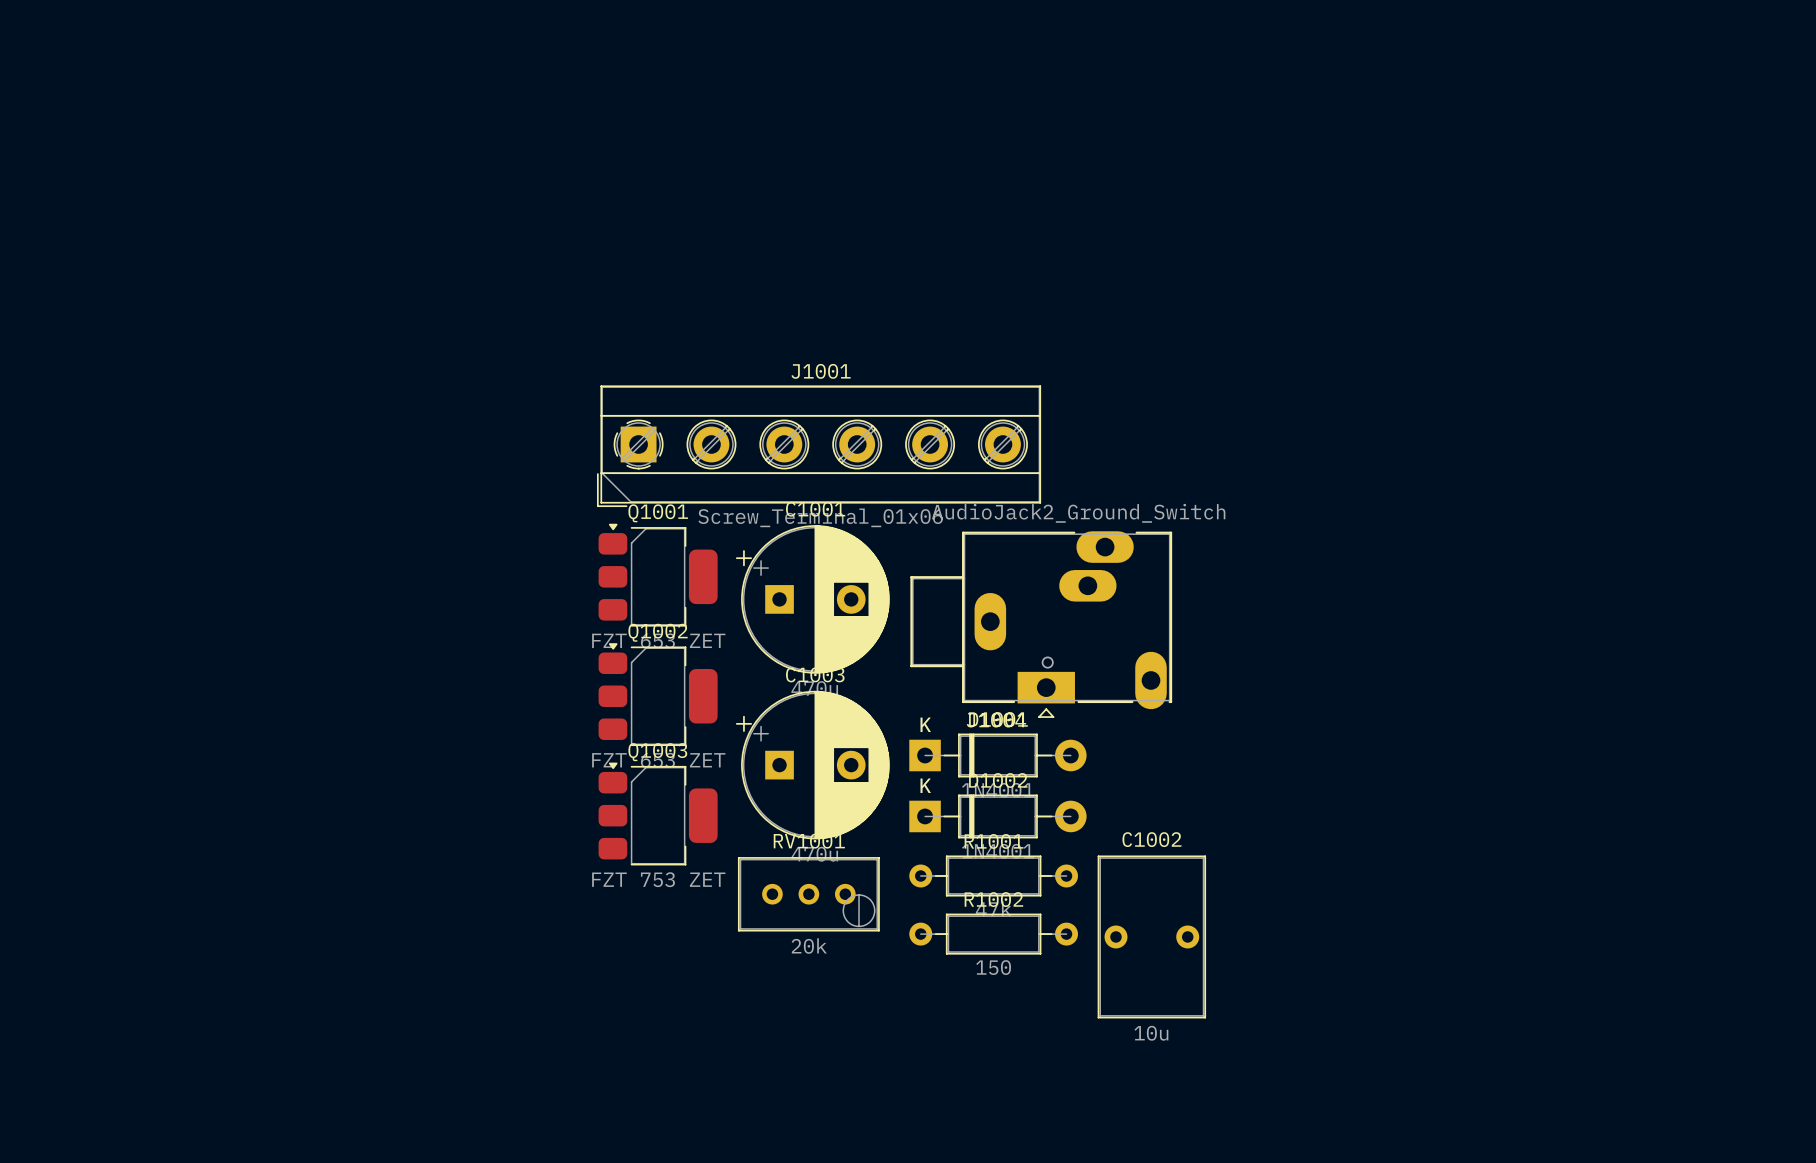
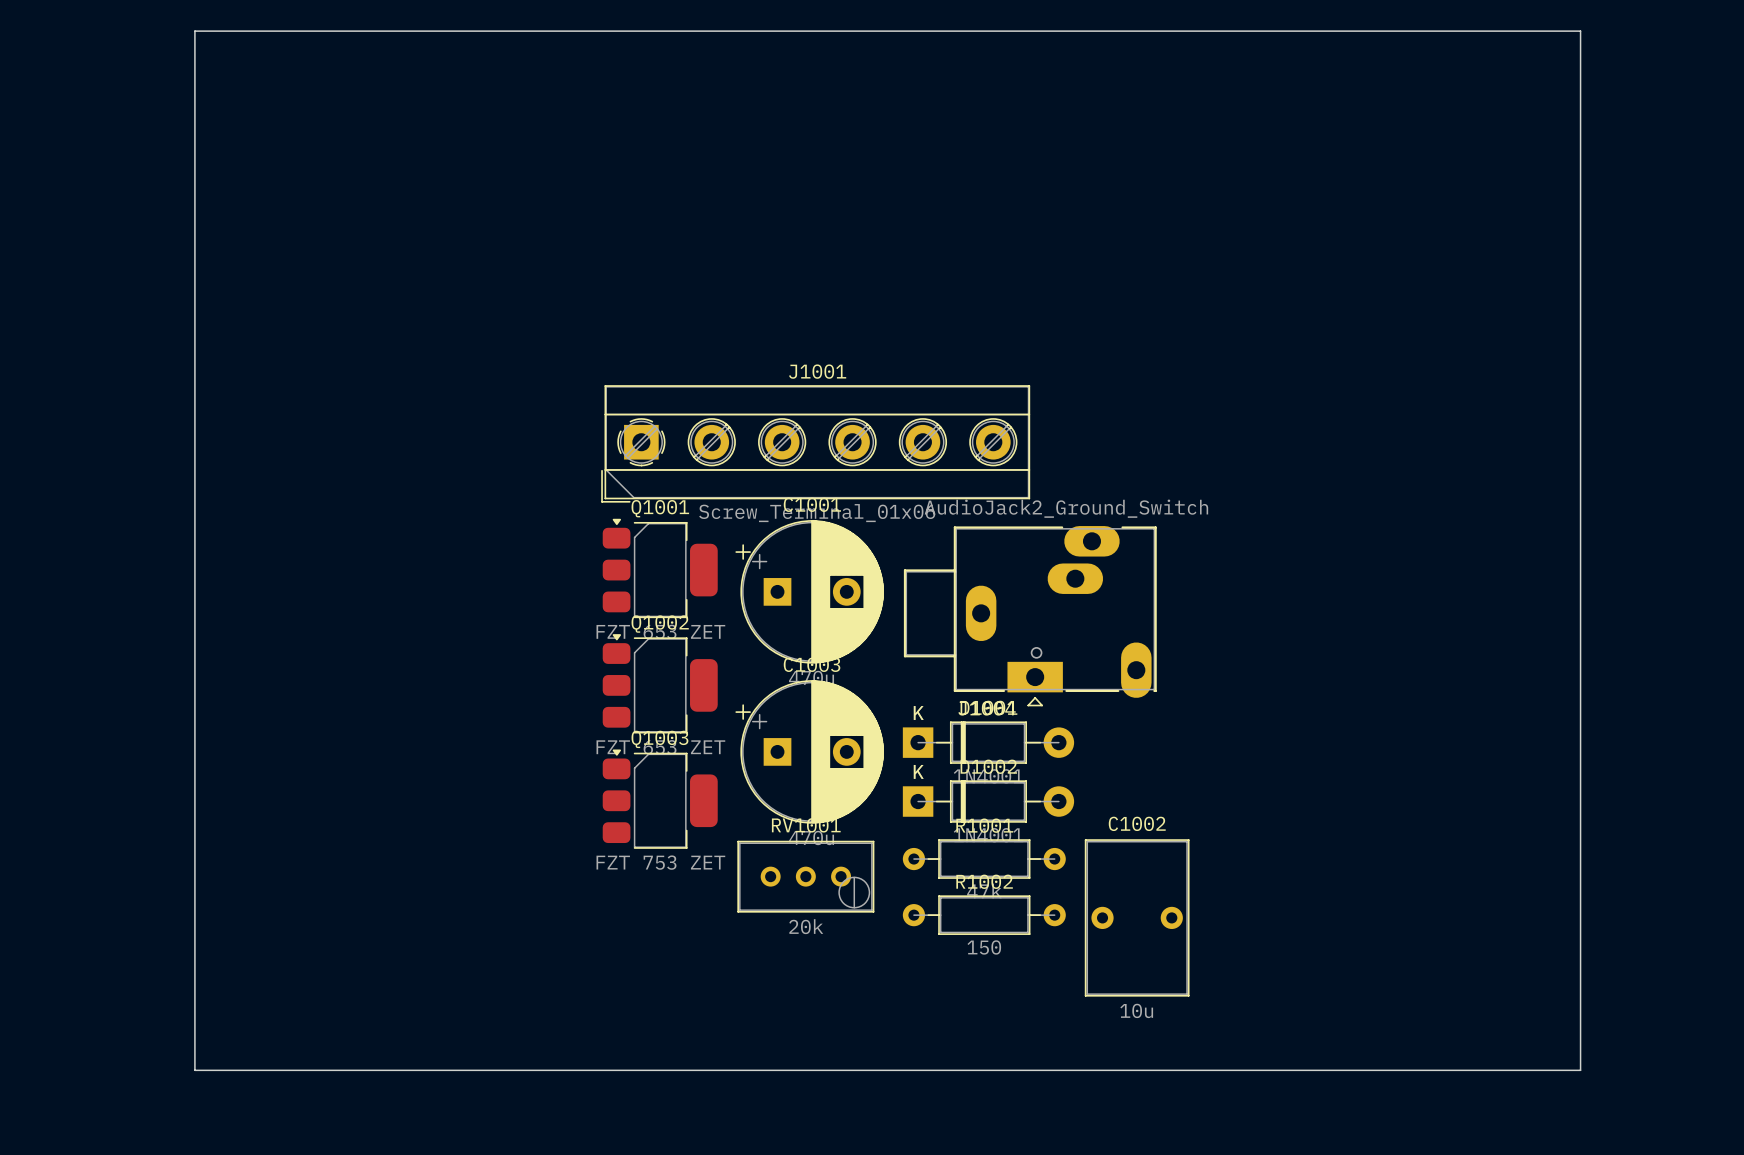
board edge: none -> (194, 31) (1580, 31) (1580, 1070) (194, 1070) (194, 31)

